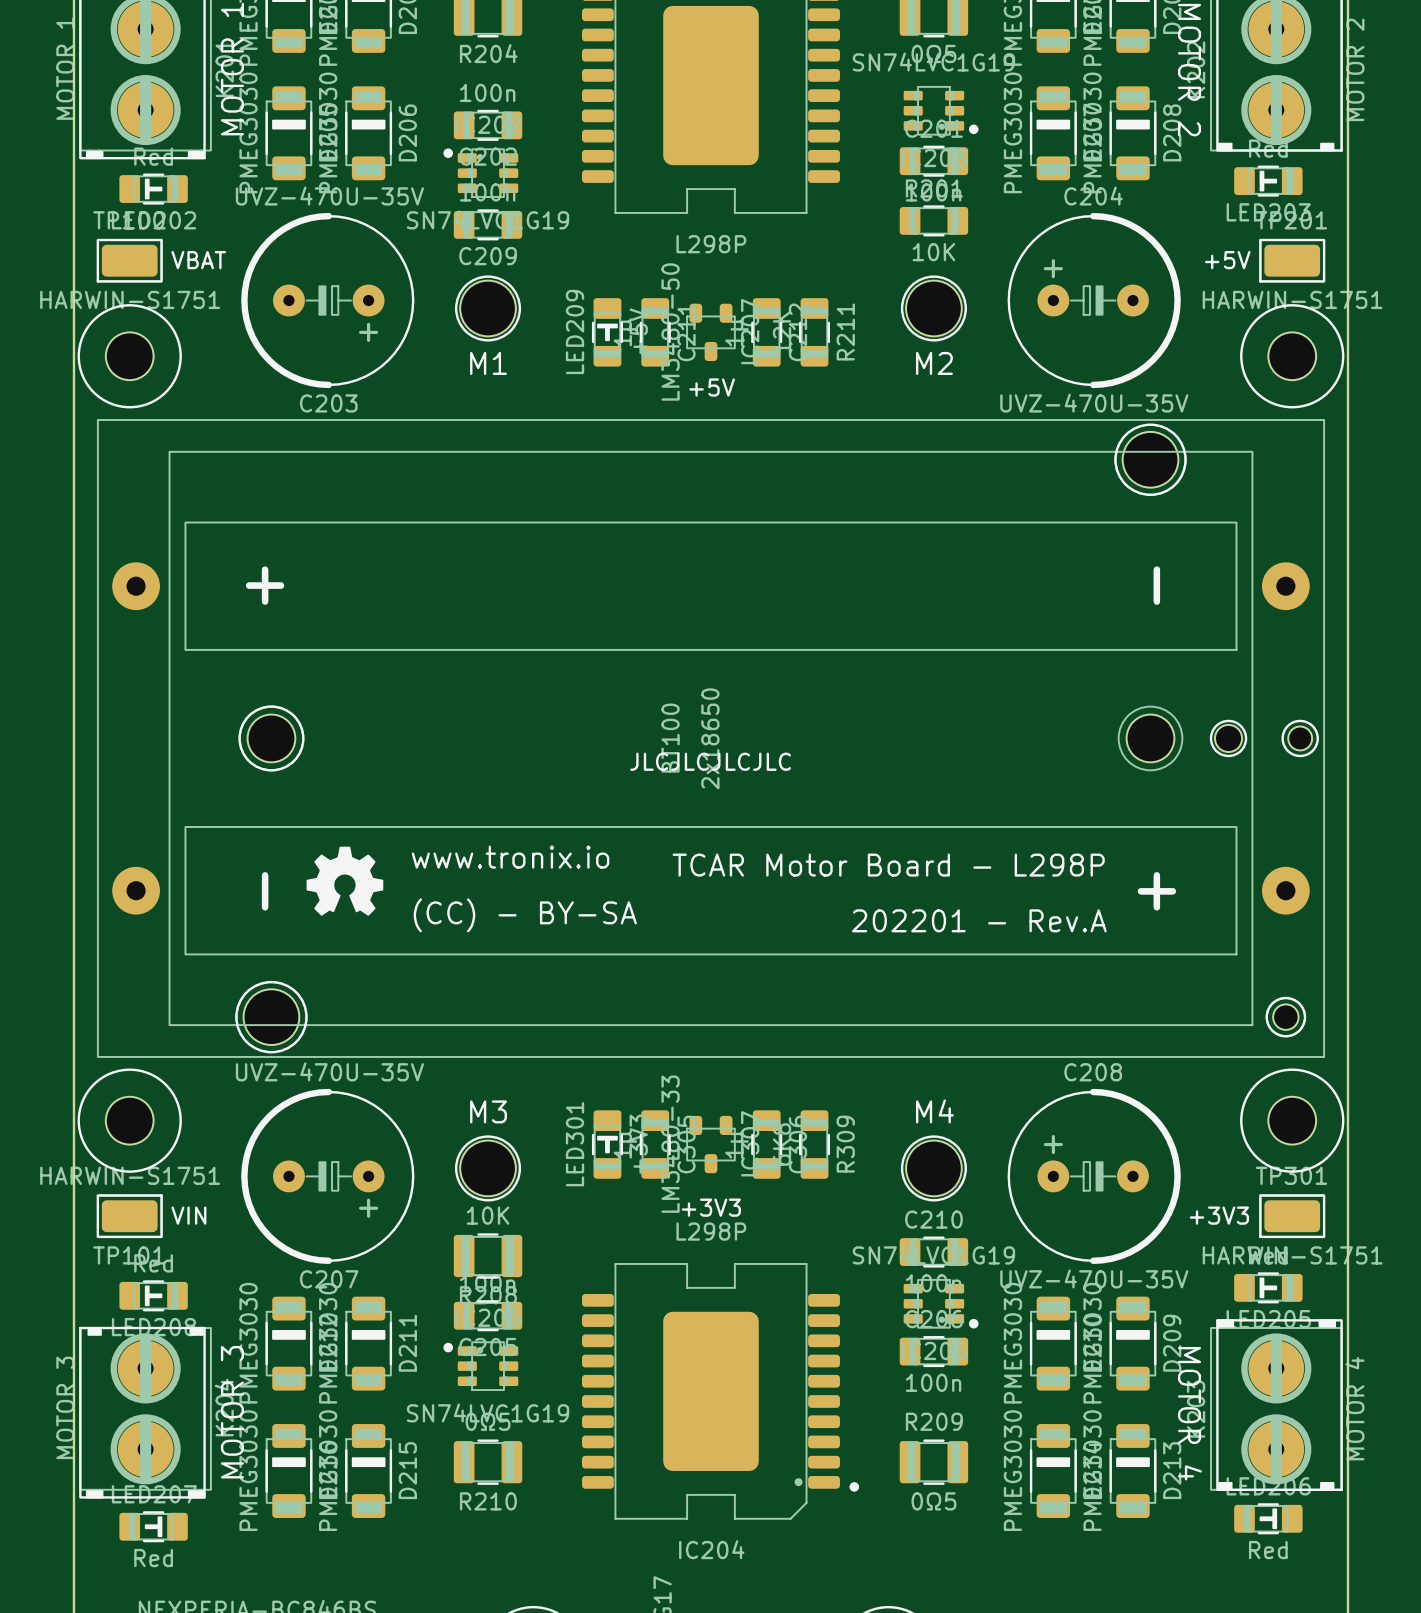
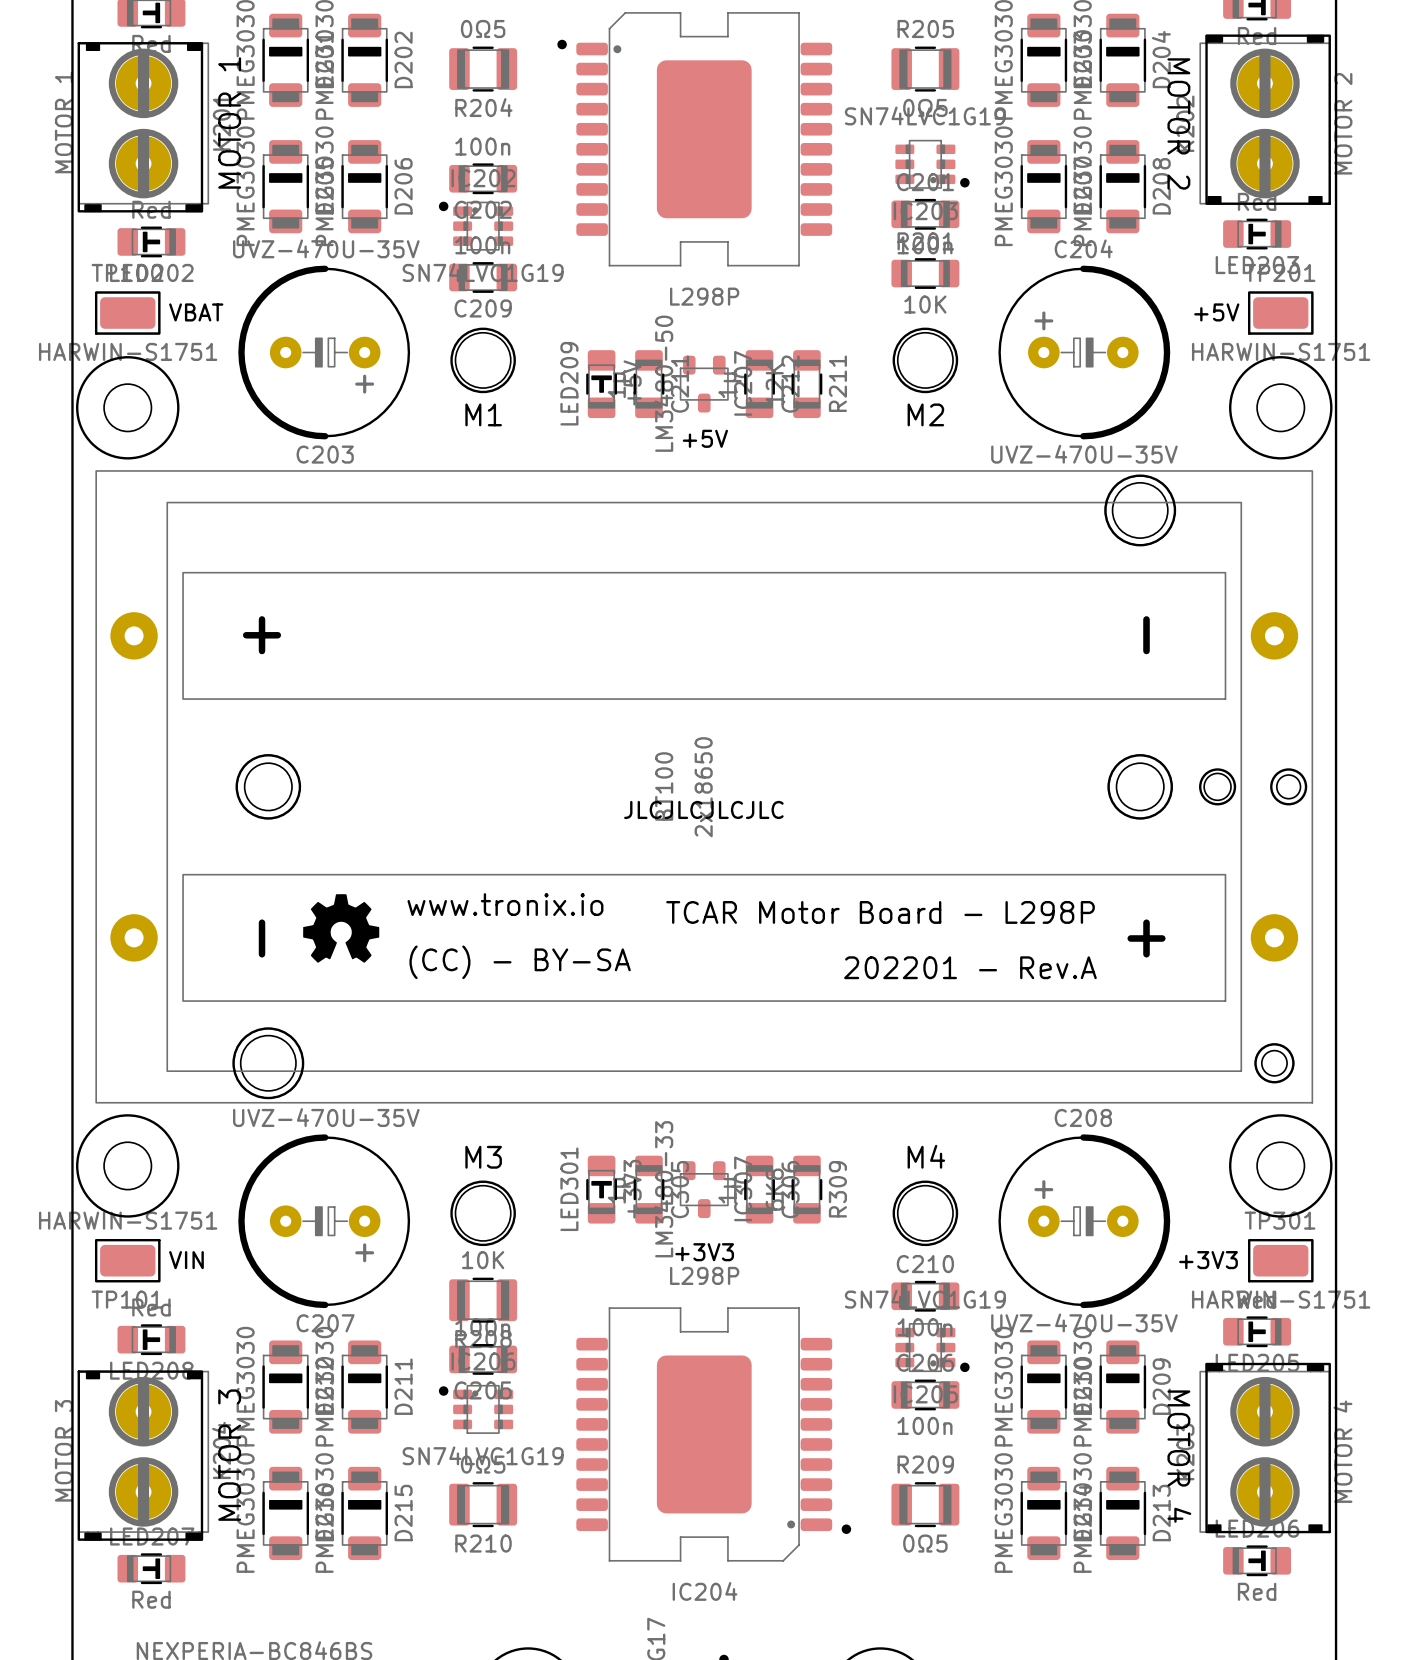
BT100 footprint: [97, 419, 1325, 1058] -> [95, 470, 1314, 1104]

